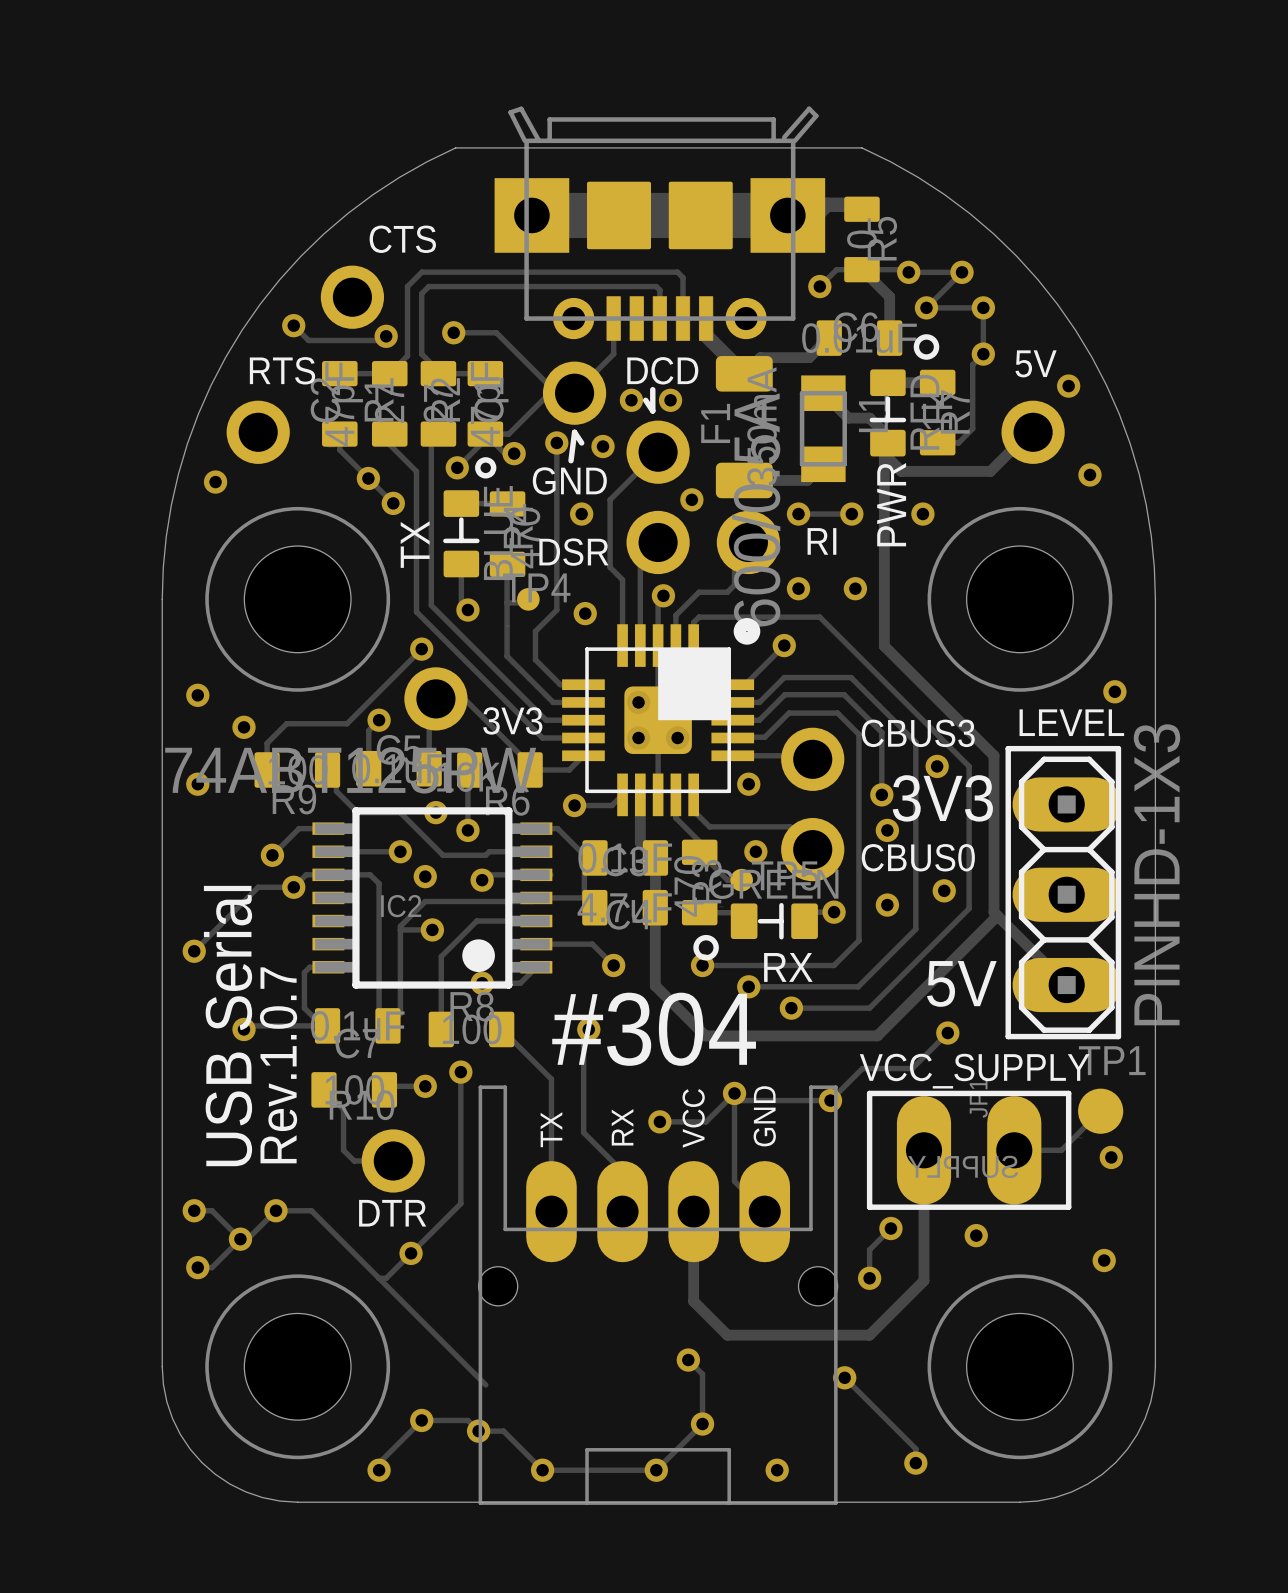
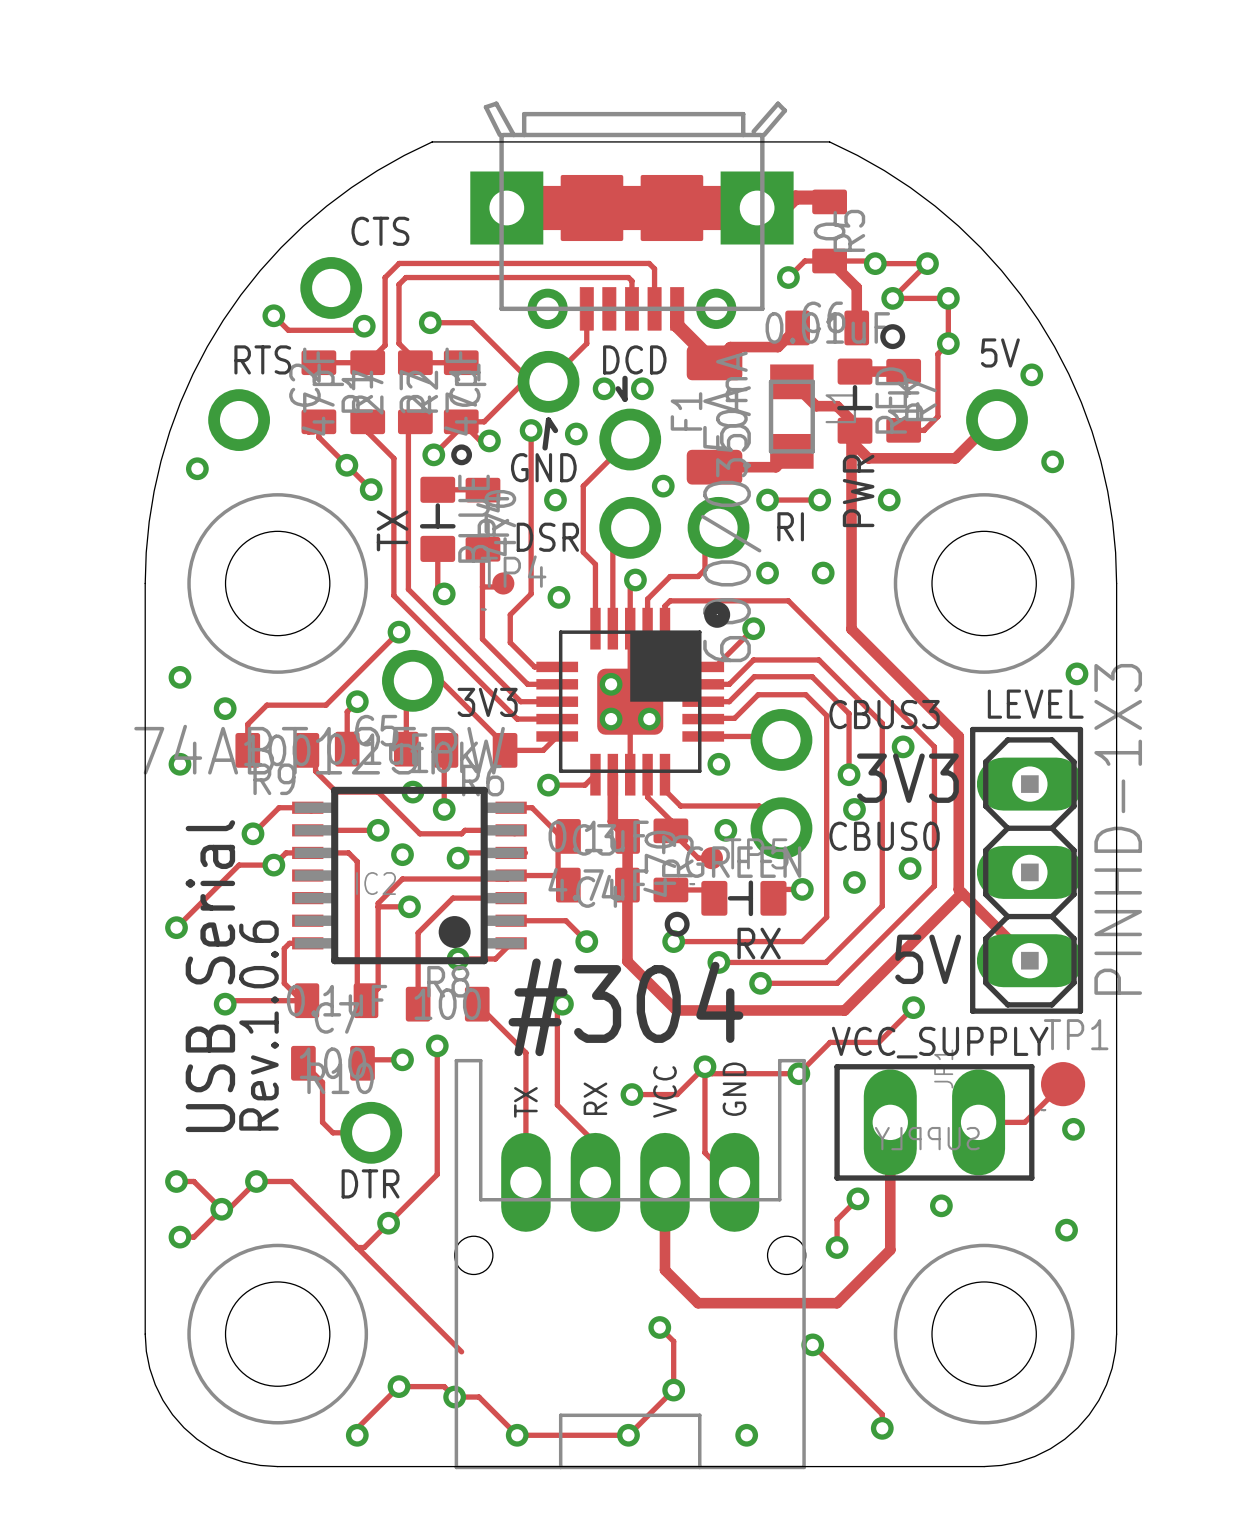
text: Rev.1.0.7 (278, 1065) -> Rev.1.0.6 (258, 1025)

